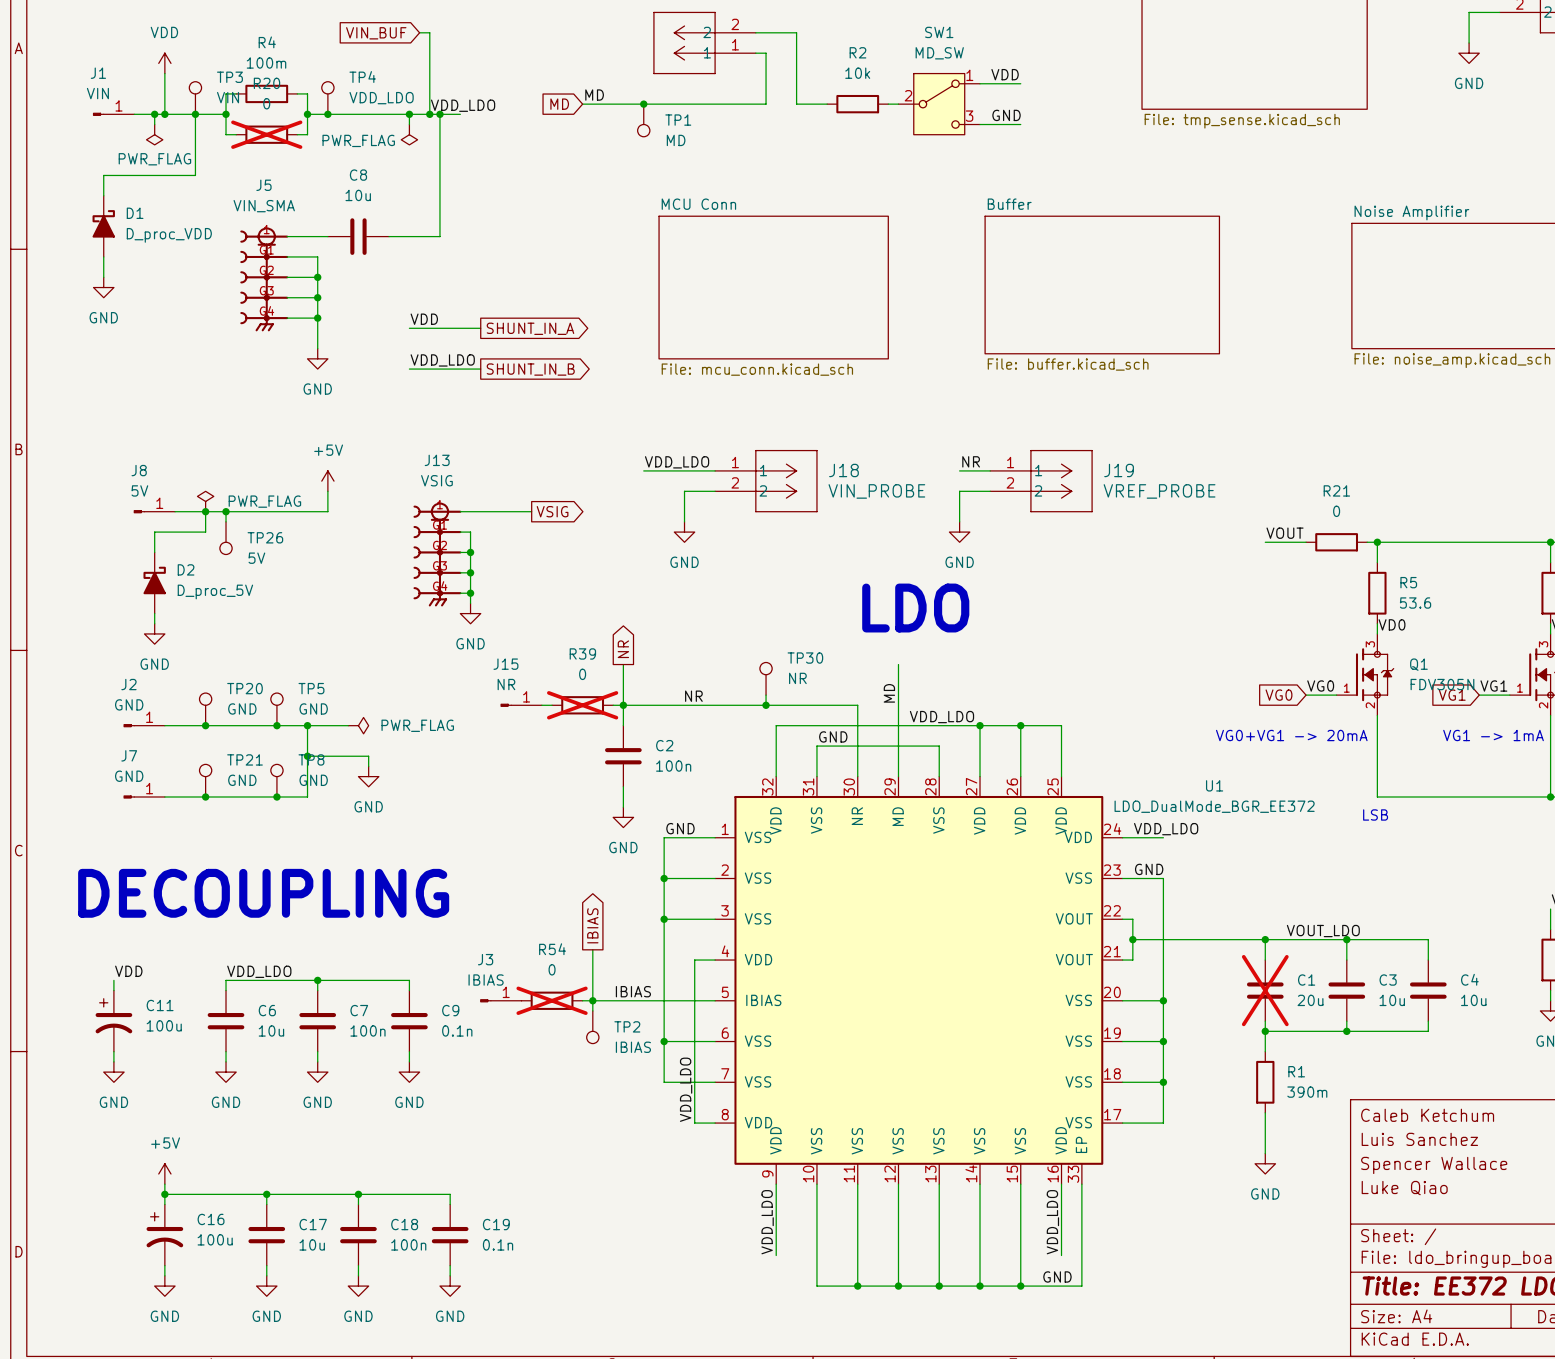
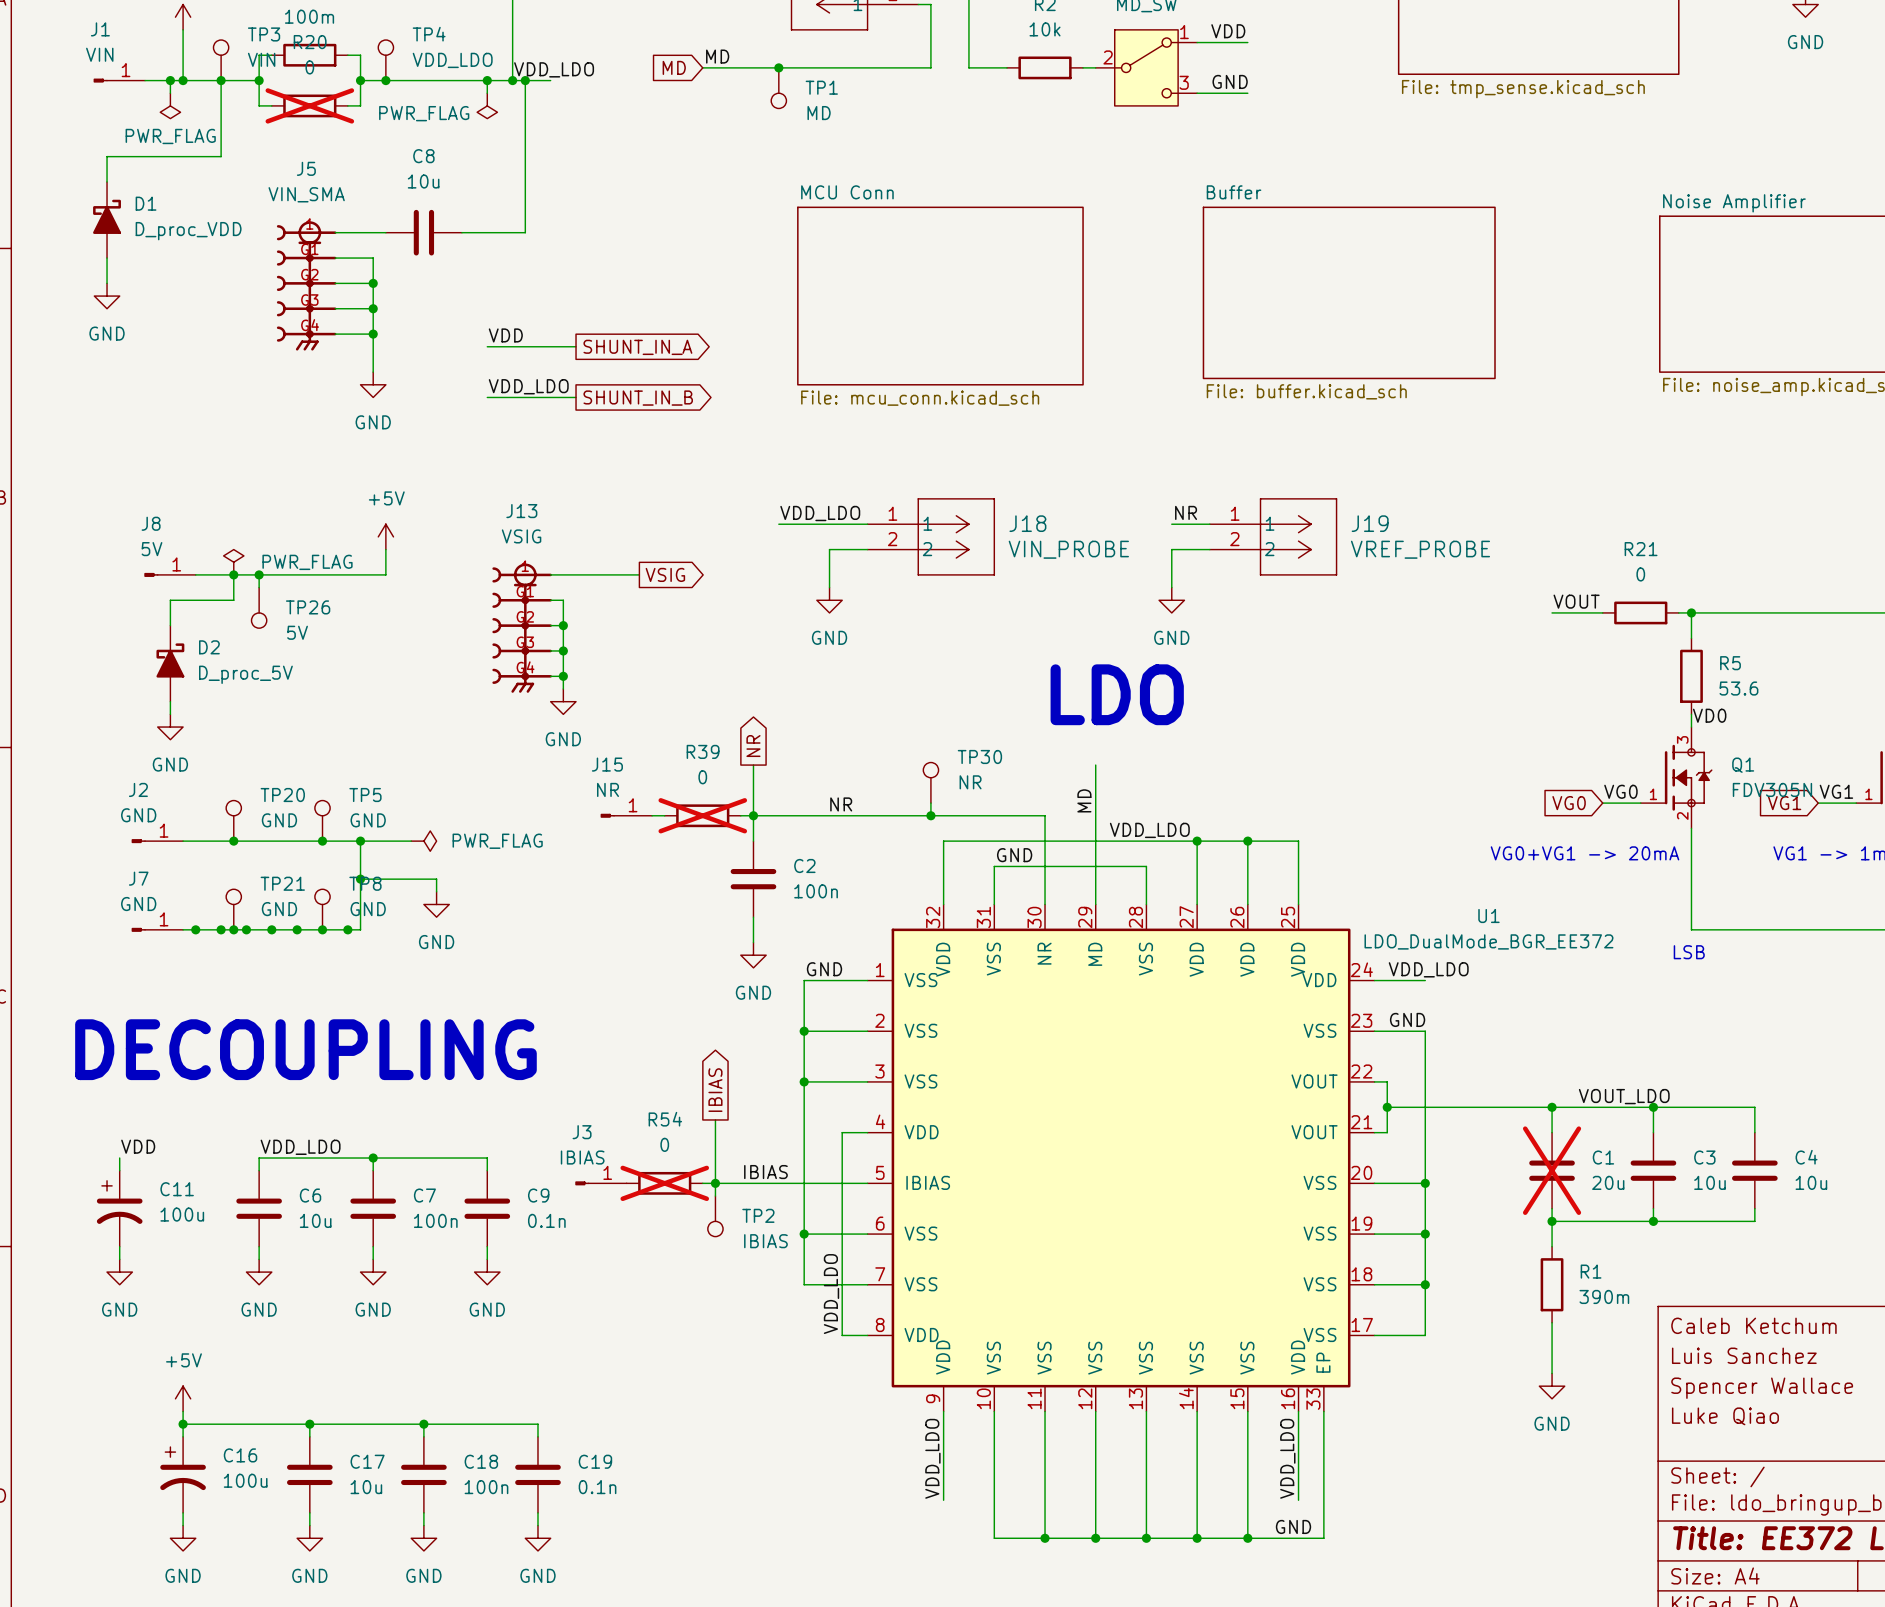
junction: none -> (195, 929)
junction: none -> (221, 929)
junction: none -> (246, 929)
junction: none -> (271, 929)
junction: none -> (297, 929)
junction: none -> (347, 929)

